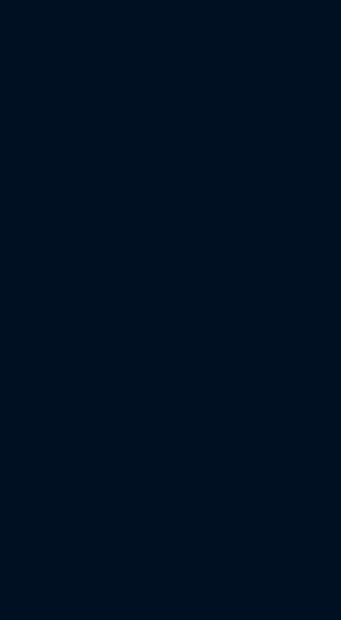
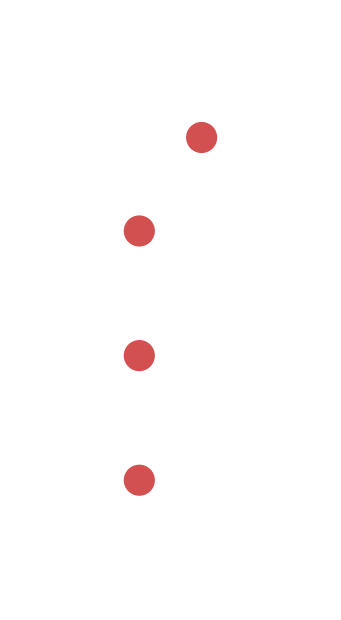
part: none -> (201, 137)
part: none -> (139, 230)
part: none -> (139, 355)
part: none -> (139, 480)

